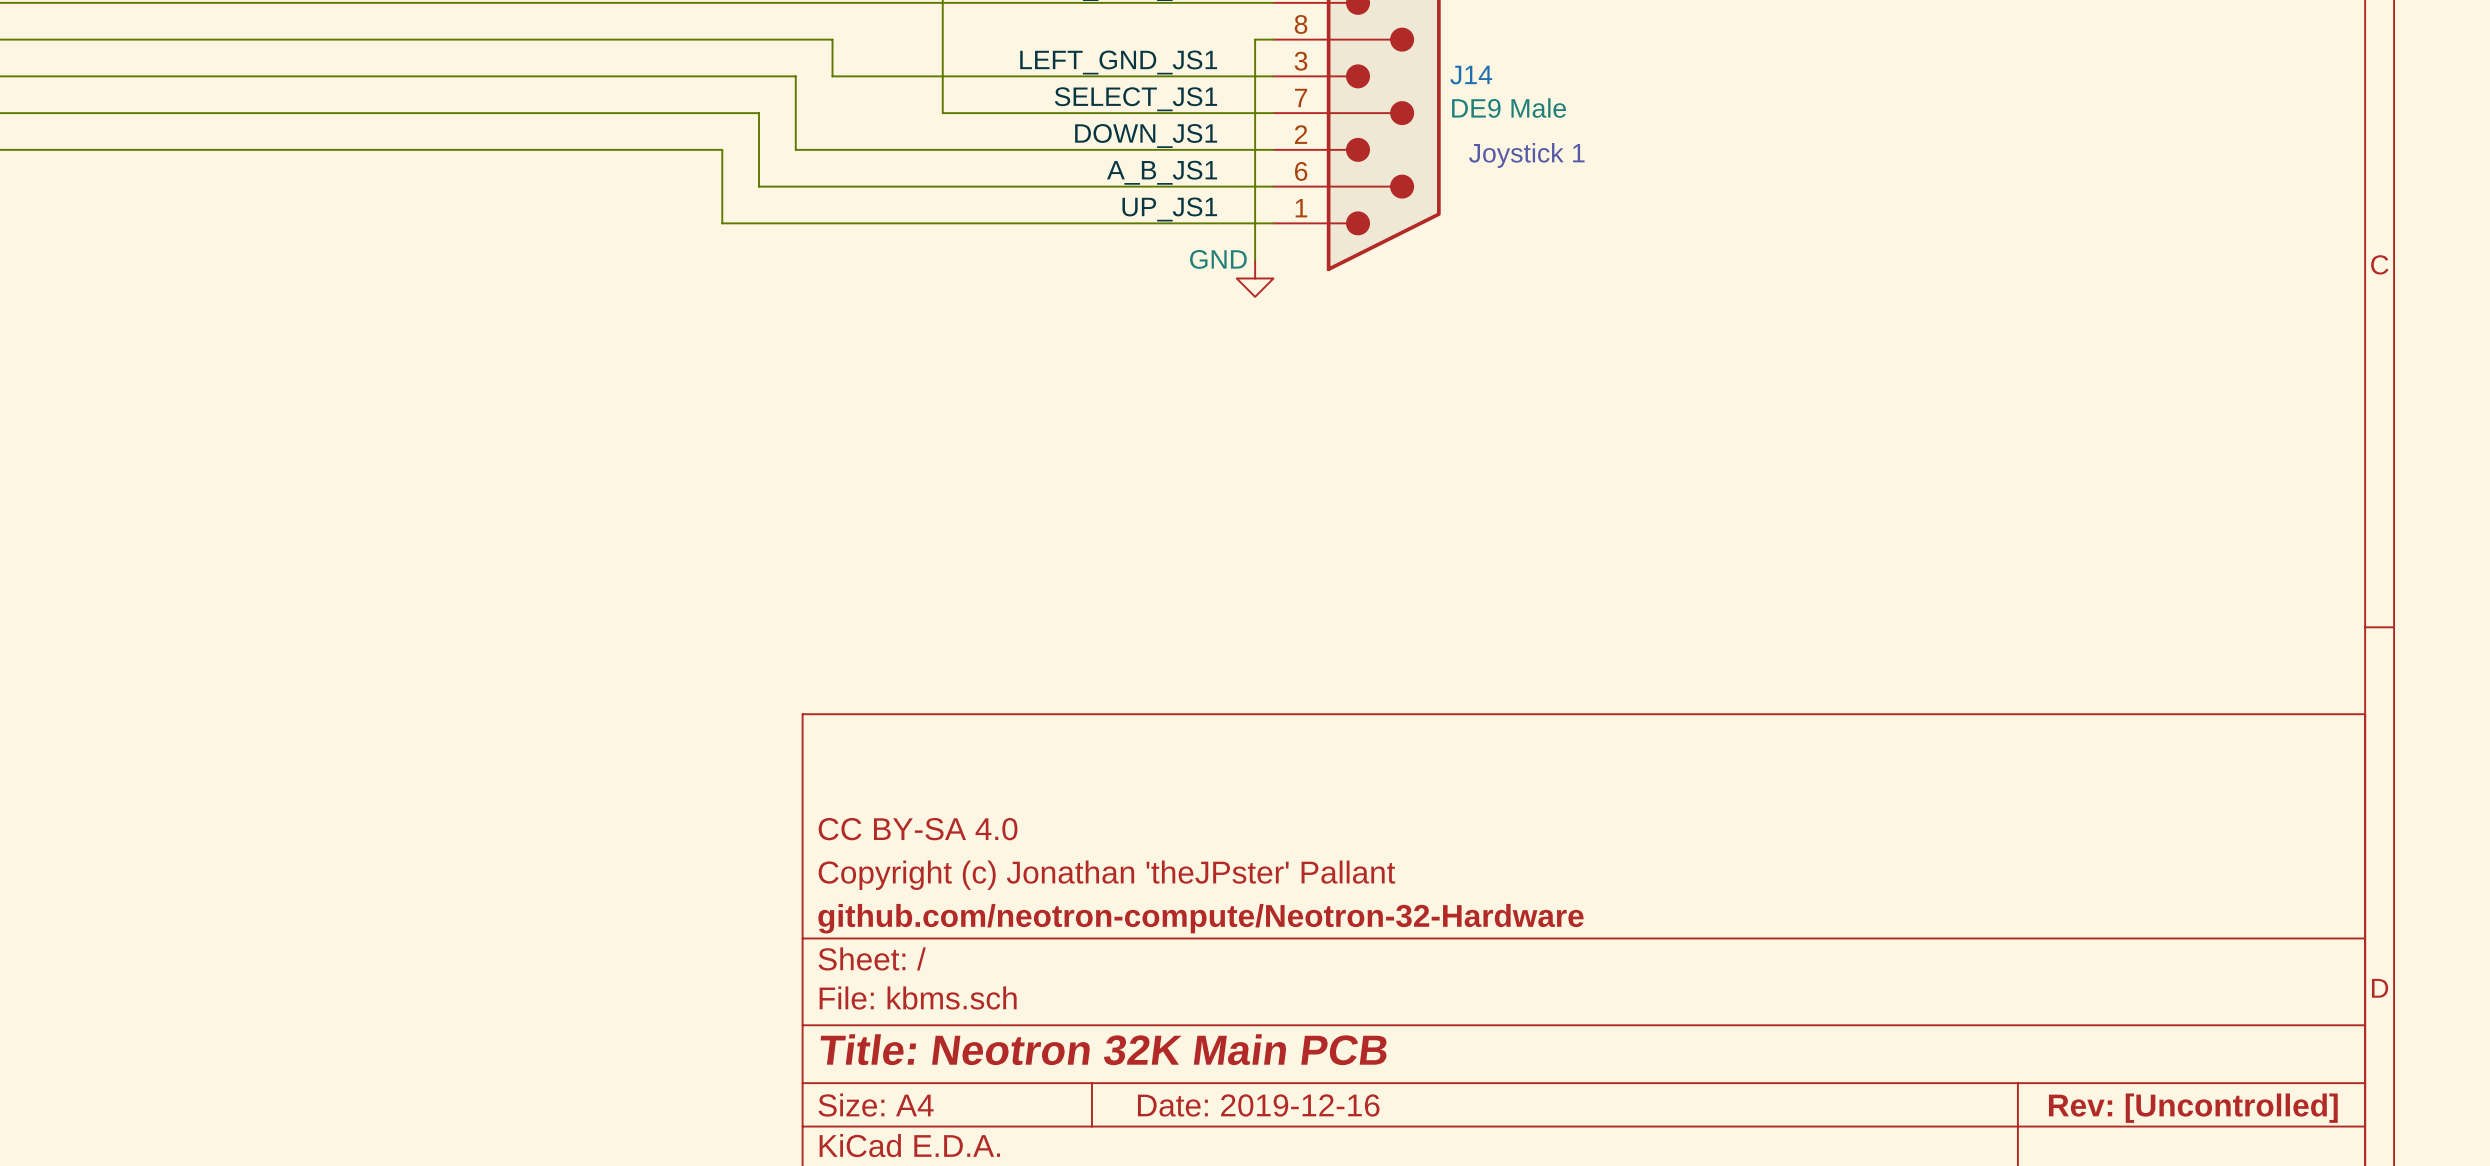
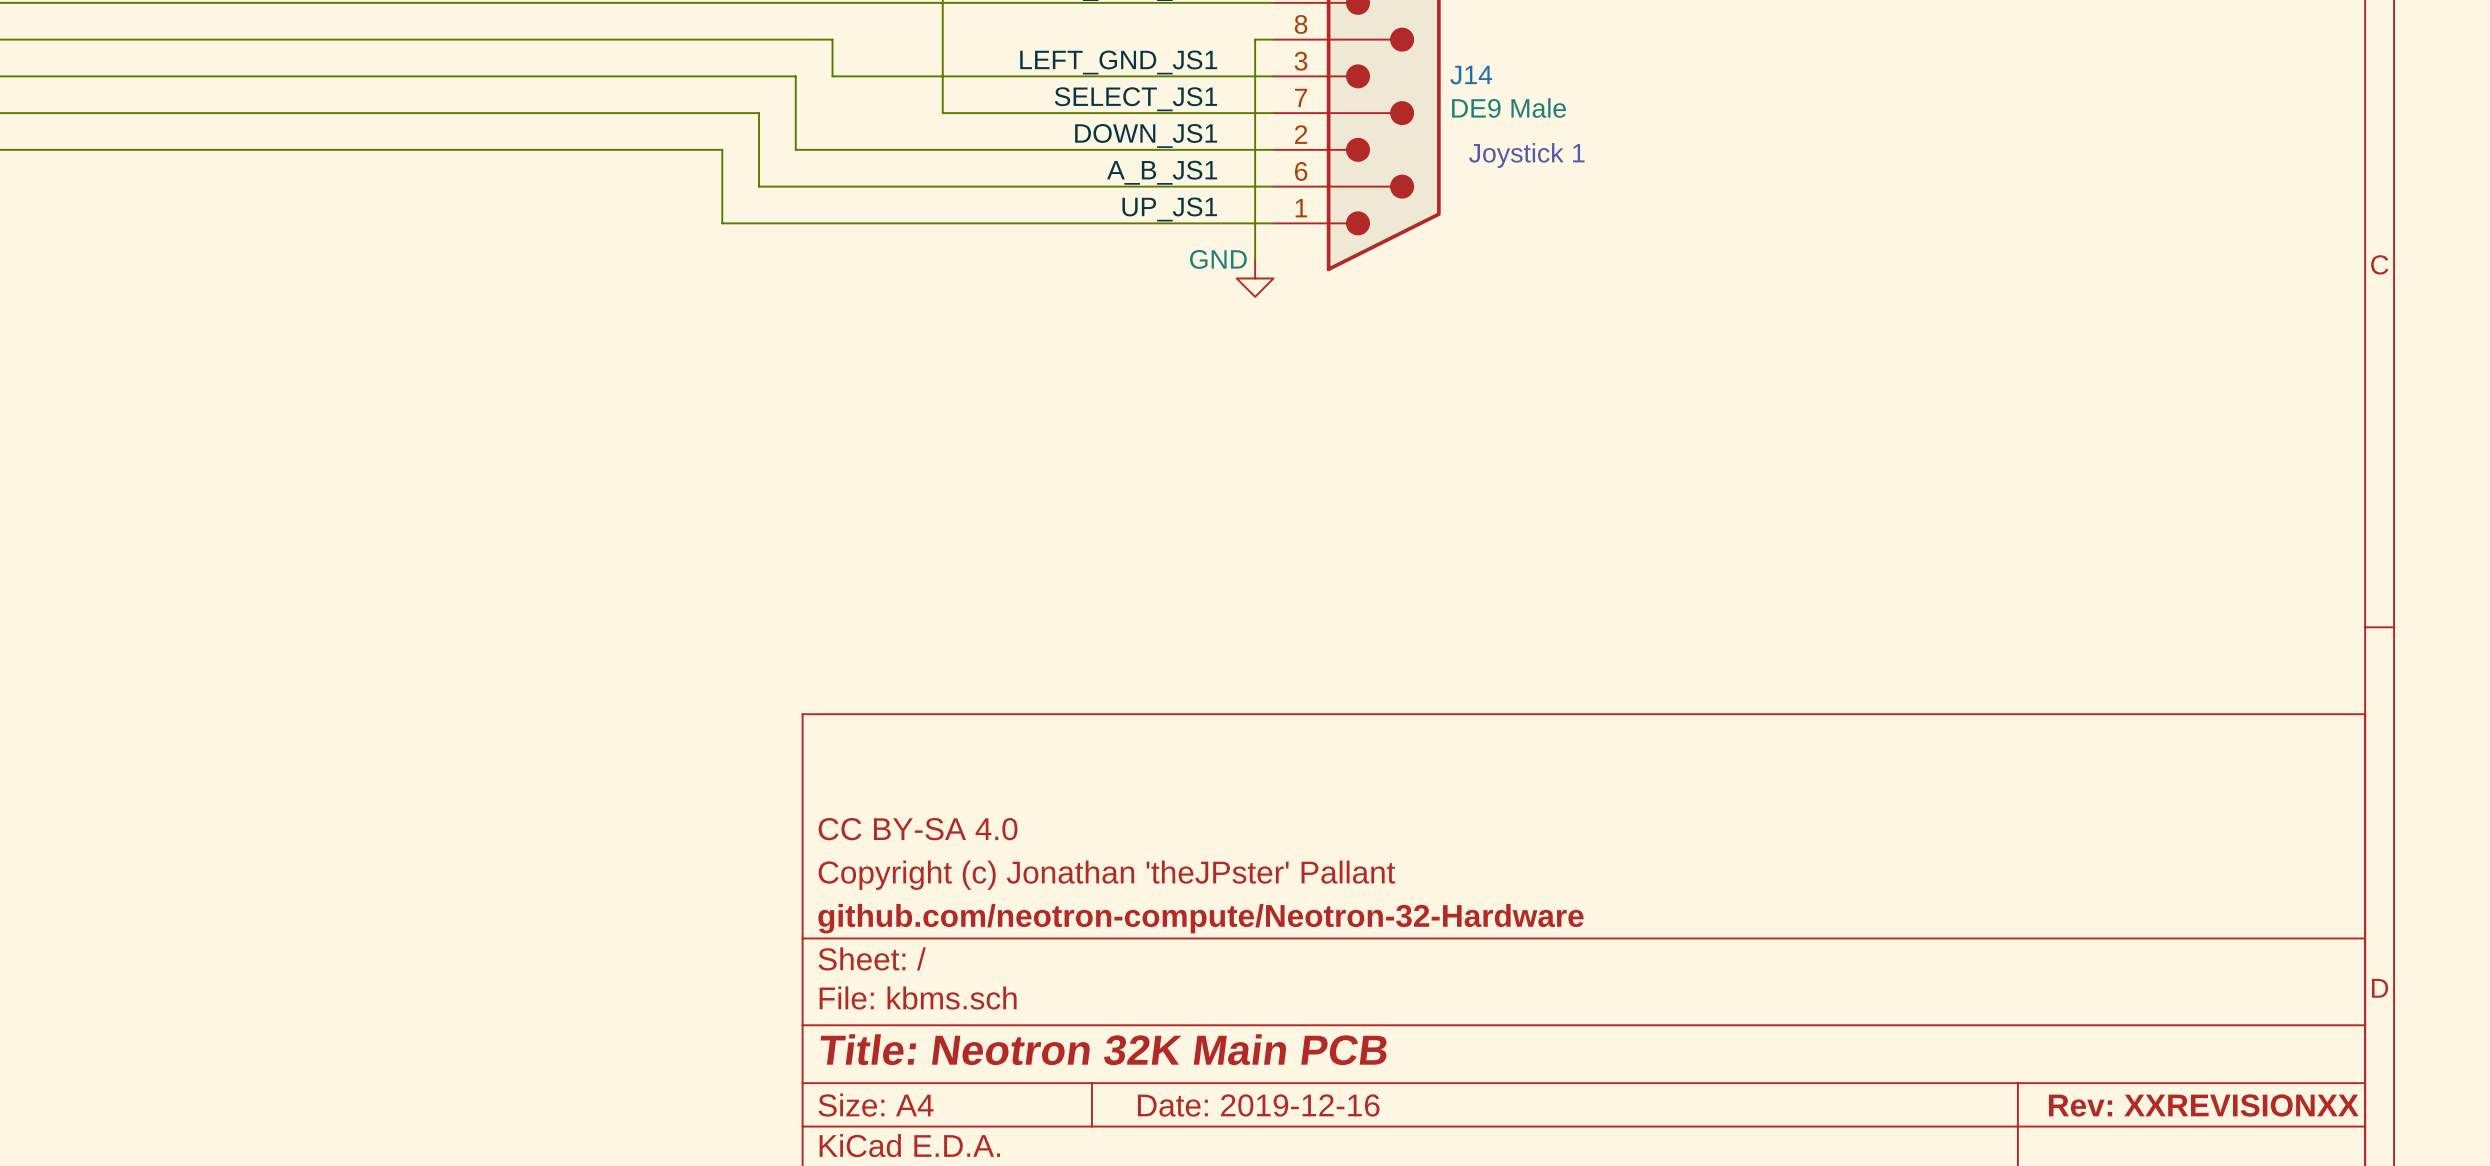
title block: Rev: [Uncontrolled] (2193, 1108) -> Rev: XXREVISIONXX (2203, 1105)

